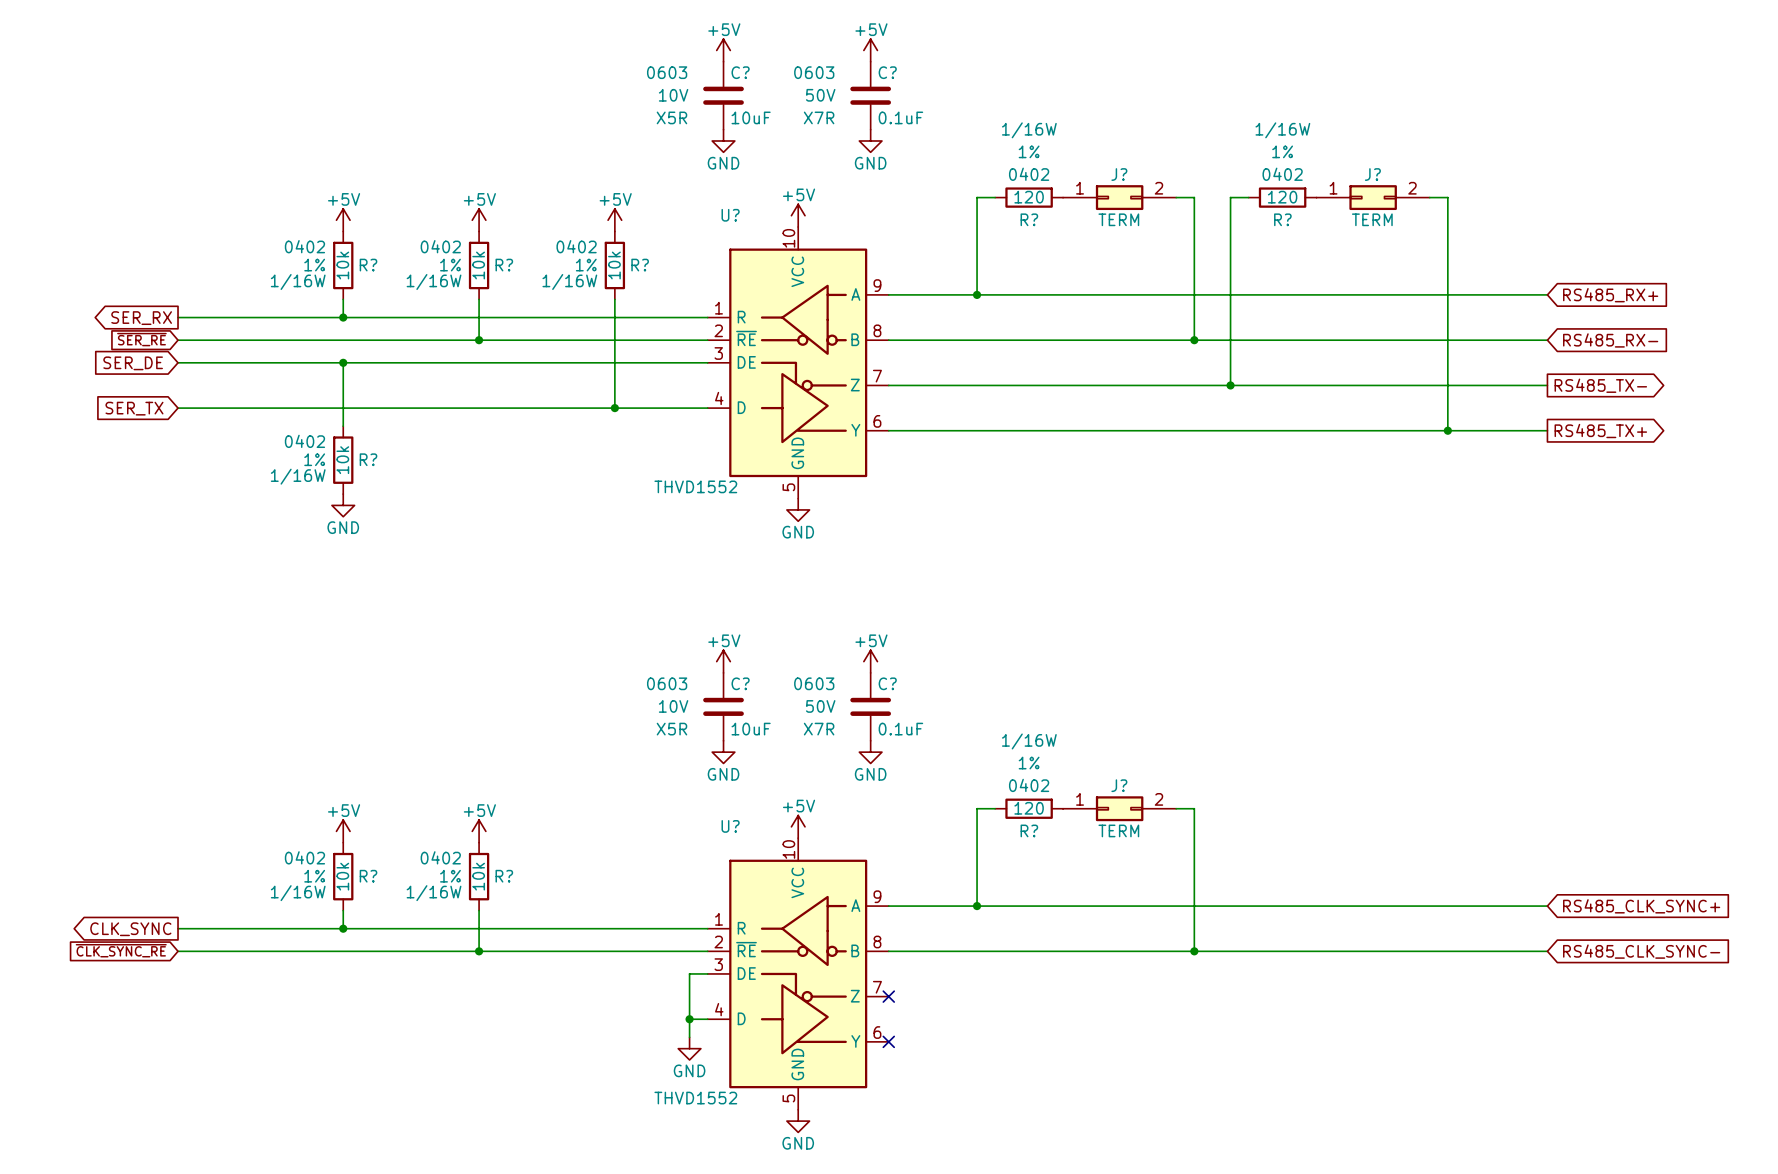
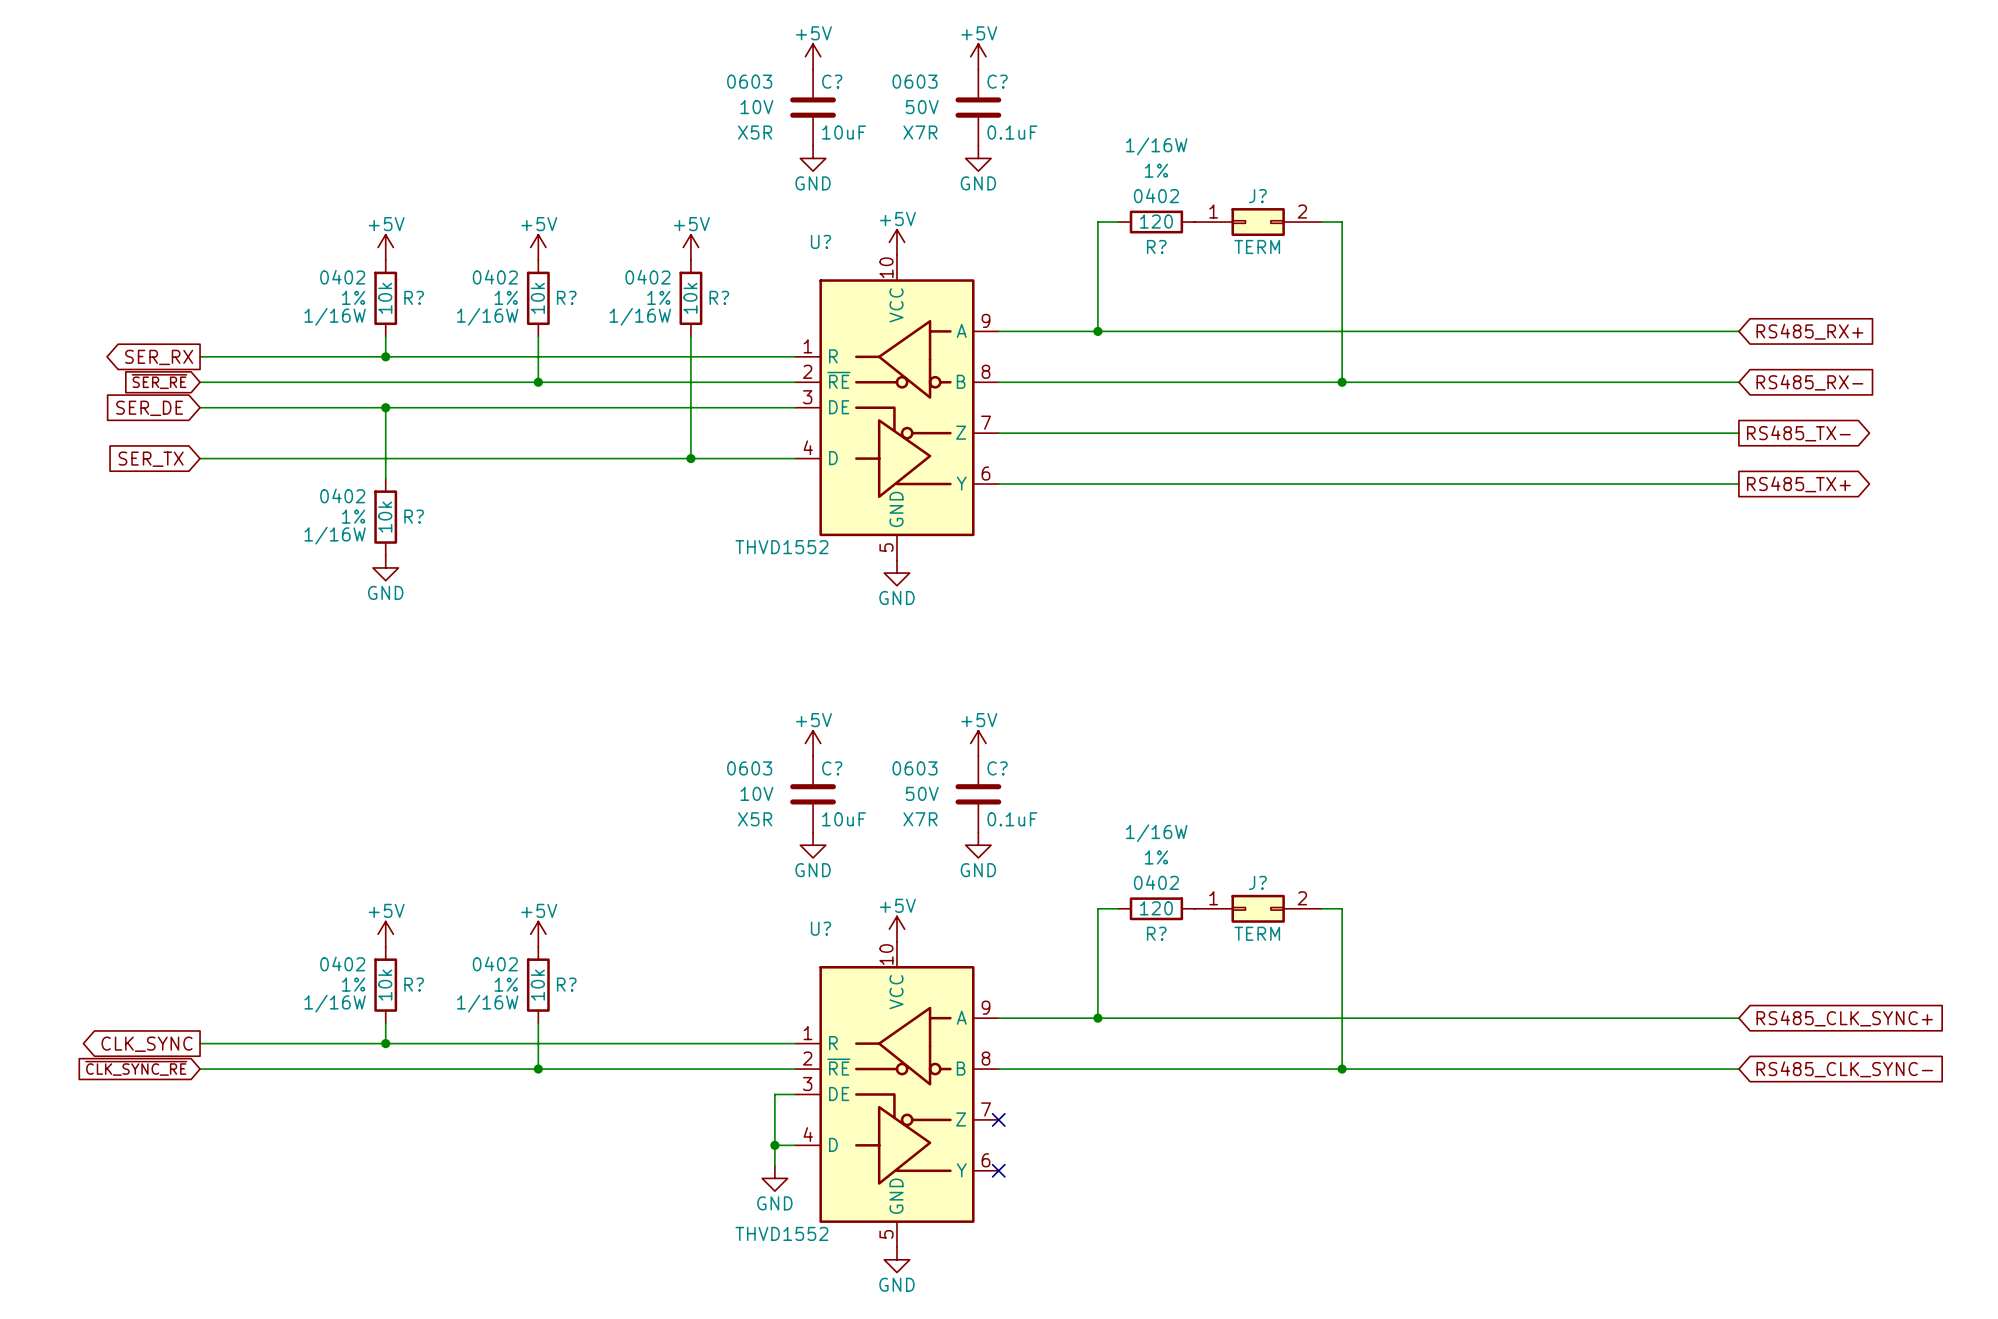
wire: (1248, 197) (1230, 197) (1230, 385) -> none
R?: 120 (1282, 197) -> none
J?: TERM (1373, 197) -> none
wire: (1429, 197) (1447, 197) (1447, 430) -> none
junction: (1230, 385) -> none
junction: (1447, 430) -> none

